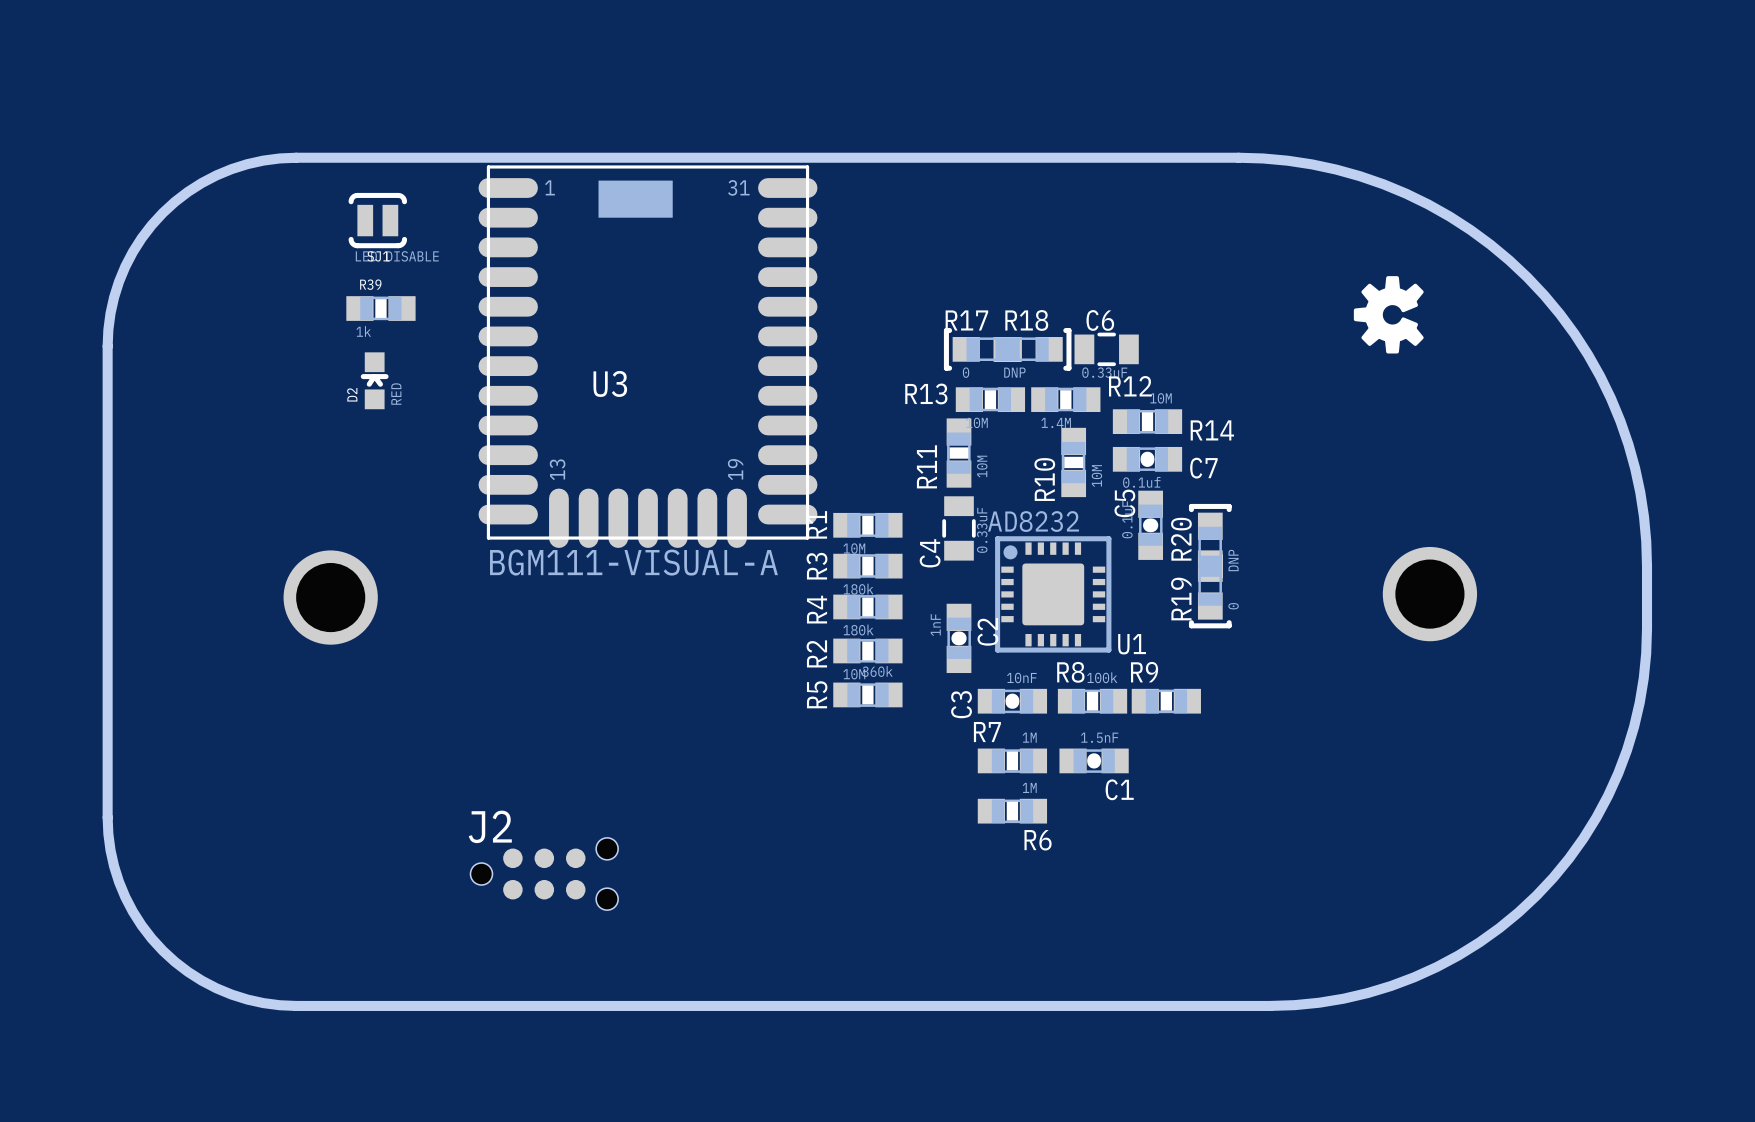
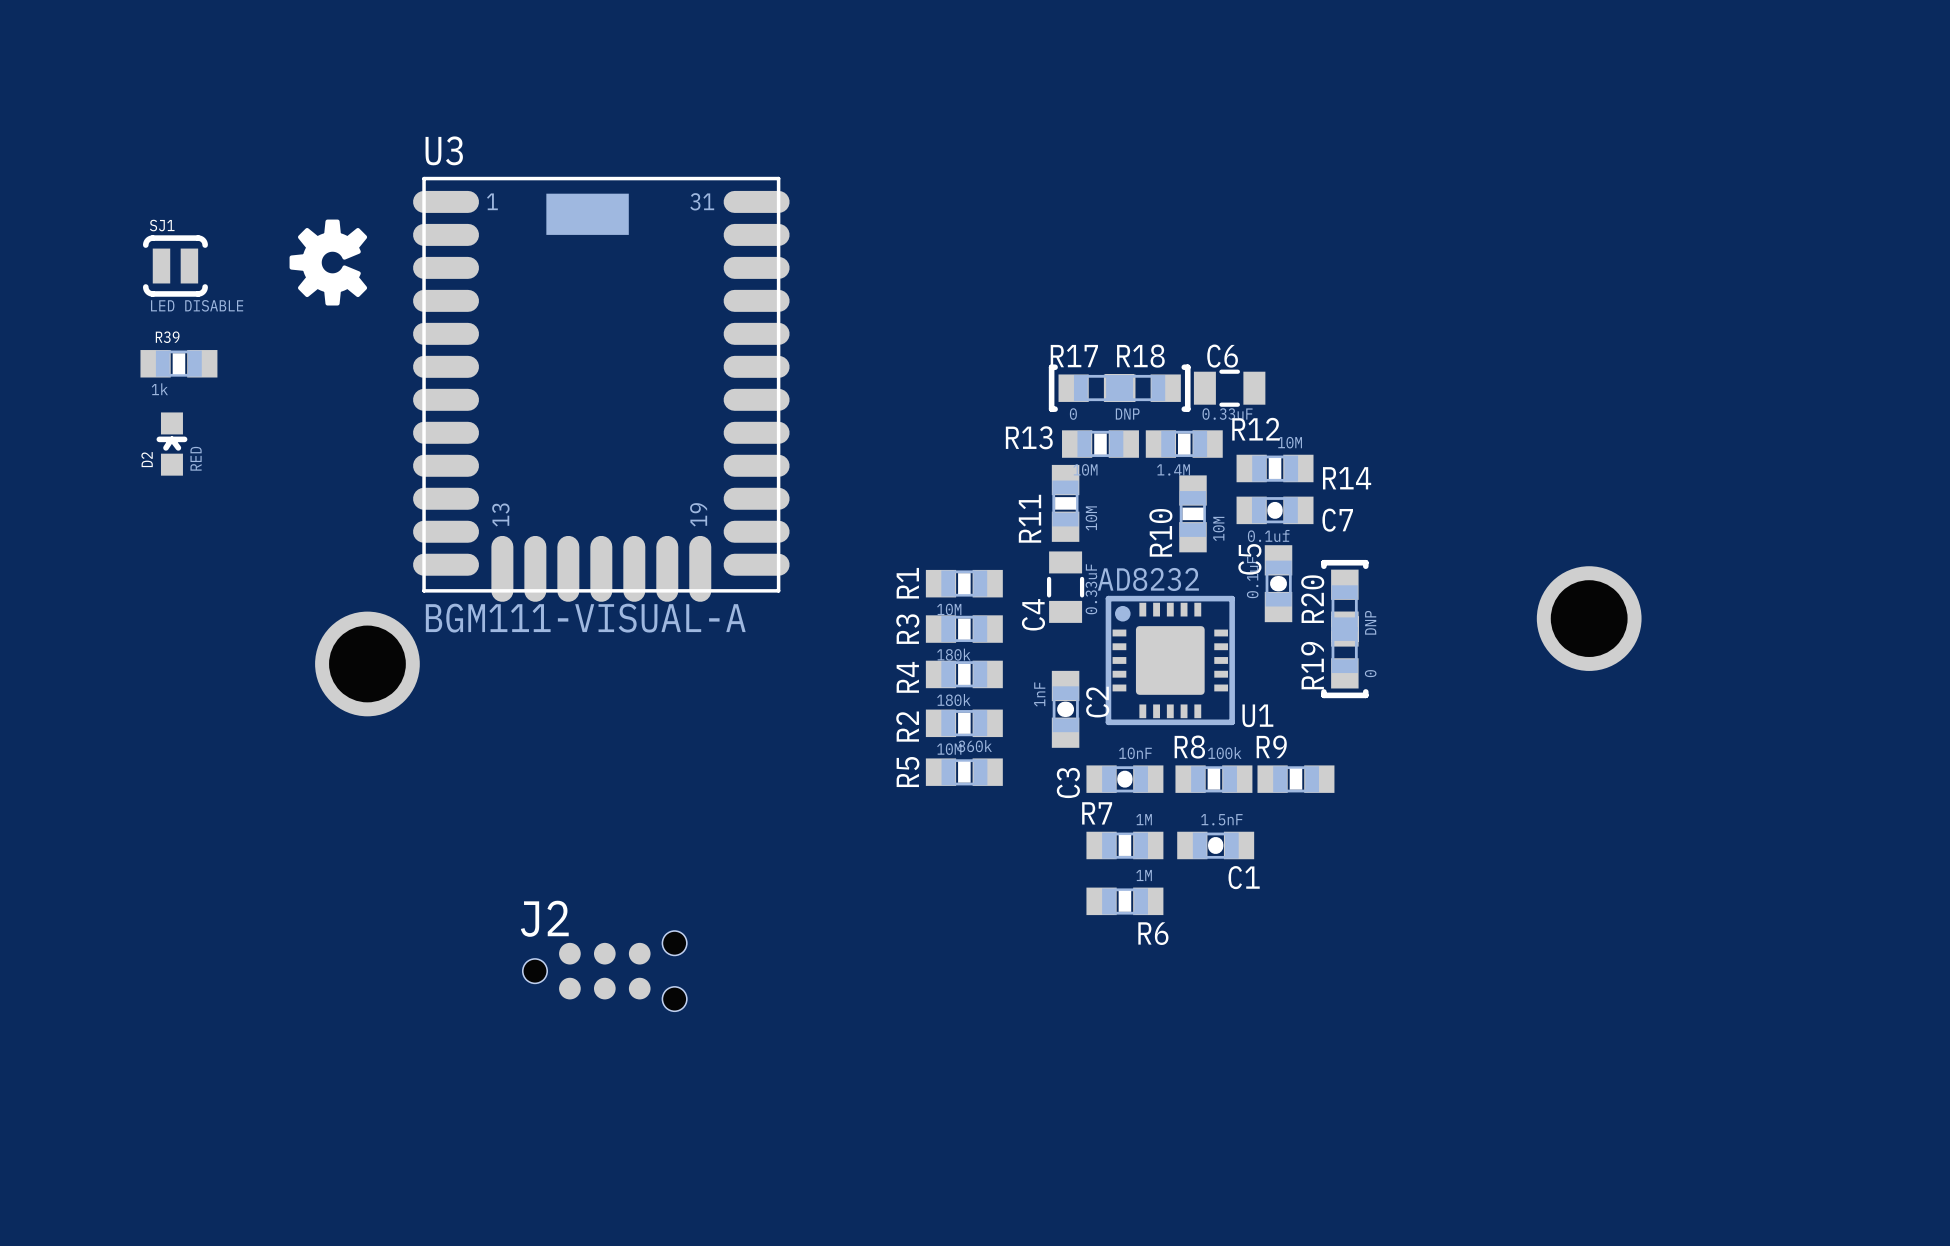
board edge: (296, 157) (1263, 158) (1336, 169) (1406, 193) (1470, 230) (1509, 260) (1544, 295) (1574, 334) (1600, 376) (1628, 444) (1640, 492) (1646, 541) (1646, 653) (1639, 702) (1634, 726) (1618, 773) (1608, 795) (1583, 838) (1553, 877) (1518, 912) (1479, 942) (1436, 967) (1414, 977) (1367, 993) (1319, 1002) (1270, 1005) (296, 1005) (247, 999) (216, 988) (174, 961) (151, 938) (125, 897) (110, 850) (107, 817) (108, 329) (114, 297) (125, 266) (141, 238) (162, 212) (188, 191) (216, 175) (247, 164) (296, 157) -> none
drawing: none -> [289, 219, 368, 306]
SJ1 position: (377, 220) -> (175, 266)
SJ1 name position: SJ1 (378, 256) -> SJ1 (162, 225)
drawing: [1353, 276, 1424, 354] -> none
R39 position: (380, 308) -> (178, 363)
U3 position: (647, 356) -> (601, 389)
D2 position: (374, 380) -> (171, 444)
U3 name position: U3 (610, 383) -> U3 (444, 150)
part position: (1429, 594) -> (1589, 618)

